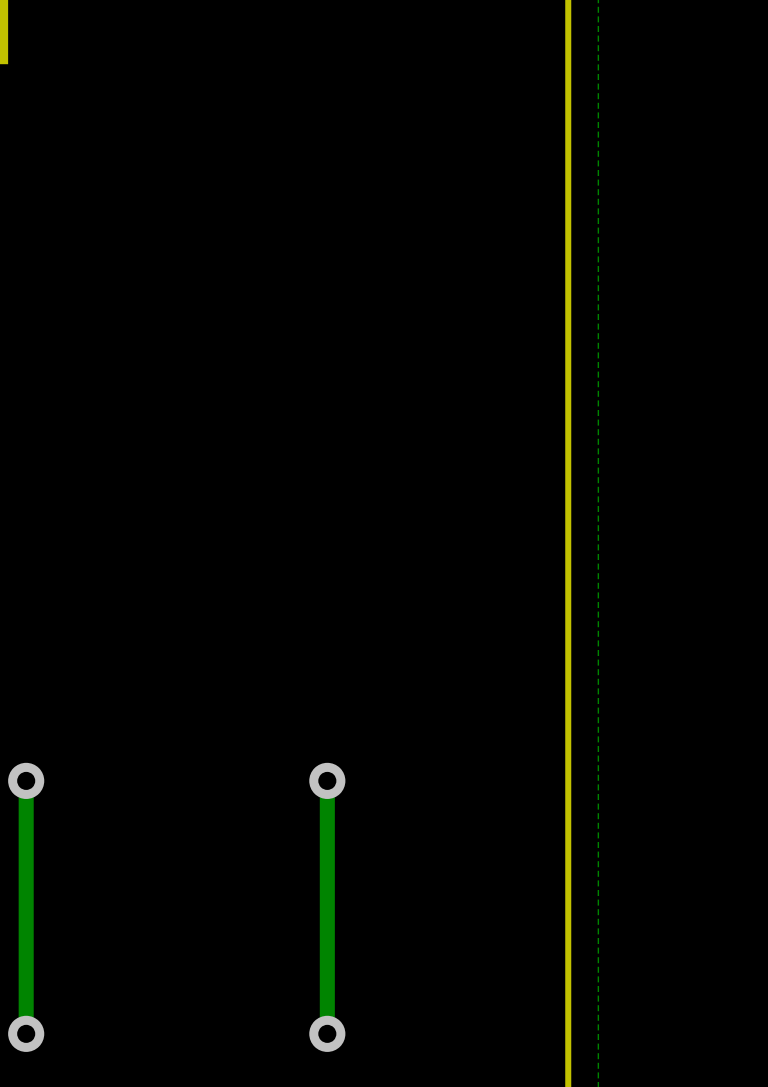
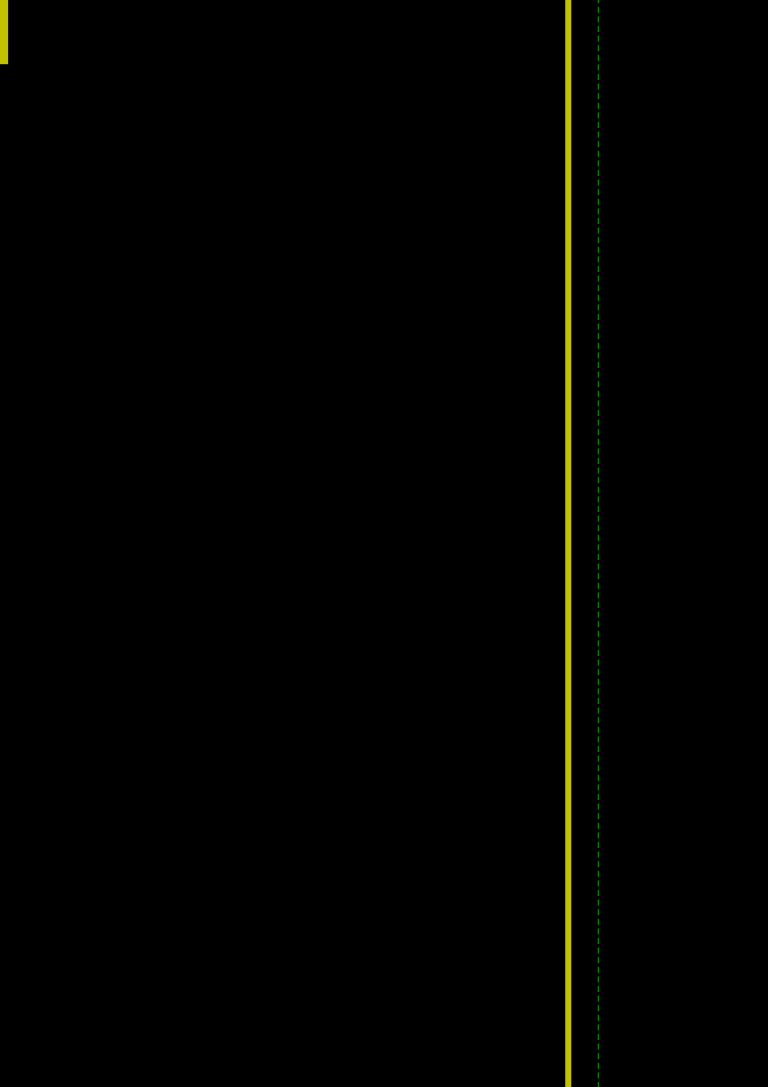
track: (26, 780) (26, 1033) -> none
via: (26, 780) -> none
track: (327, 780) (327, 1033) -> none
via: (327, 780) -> none
via: (26, 1033) -> none
via: (327, 1033) -> none

